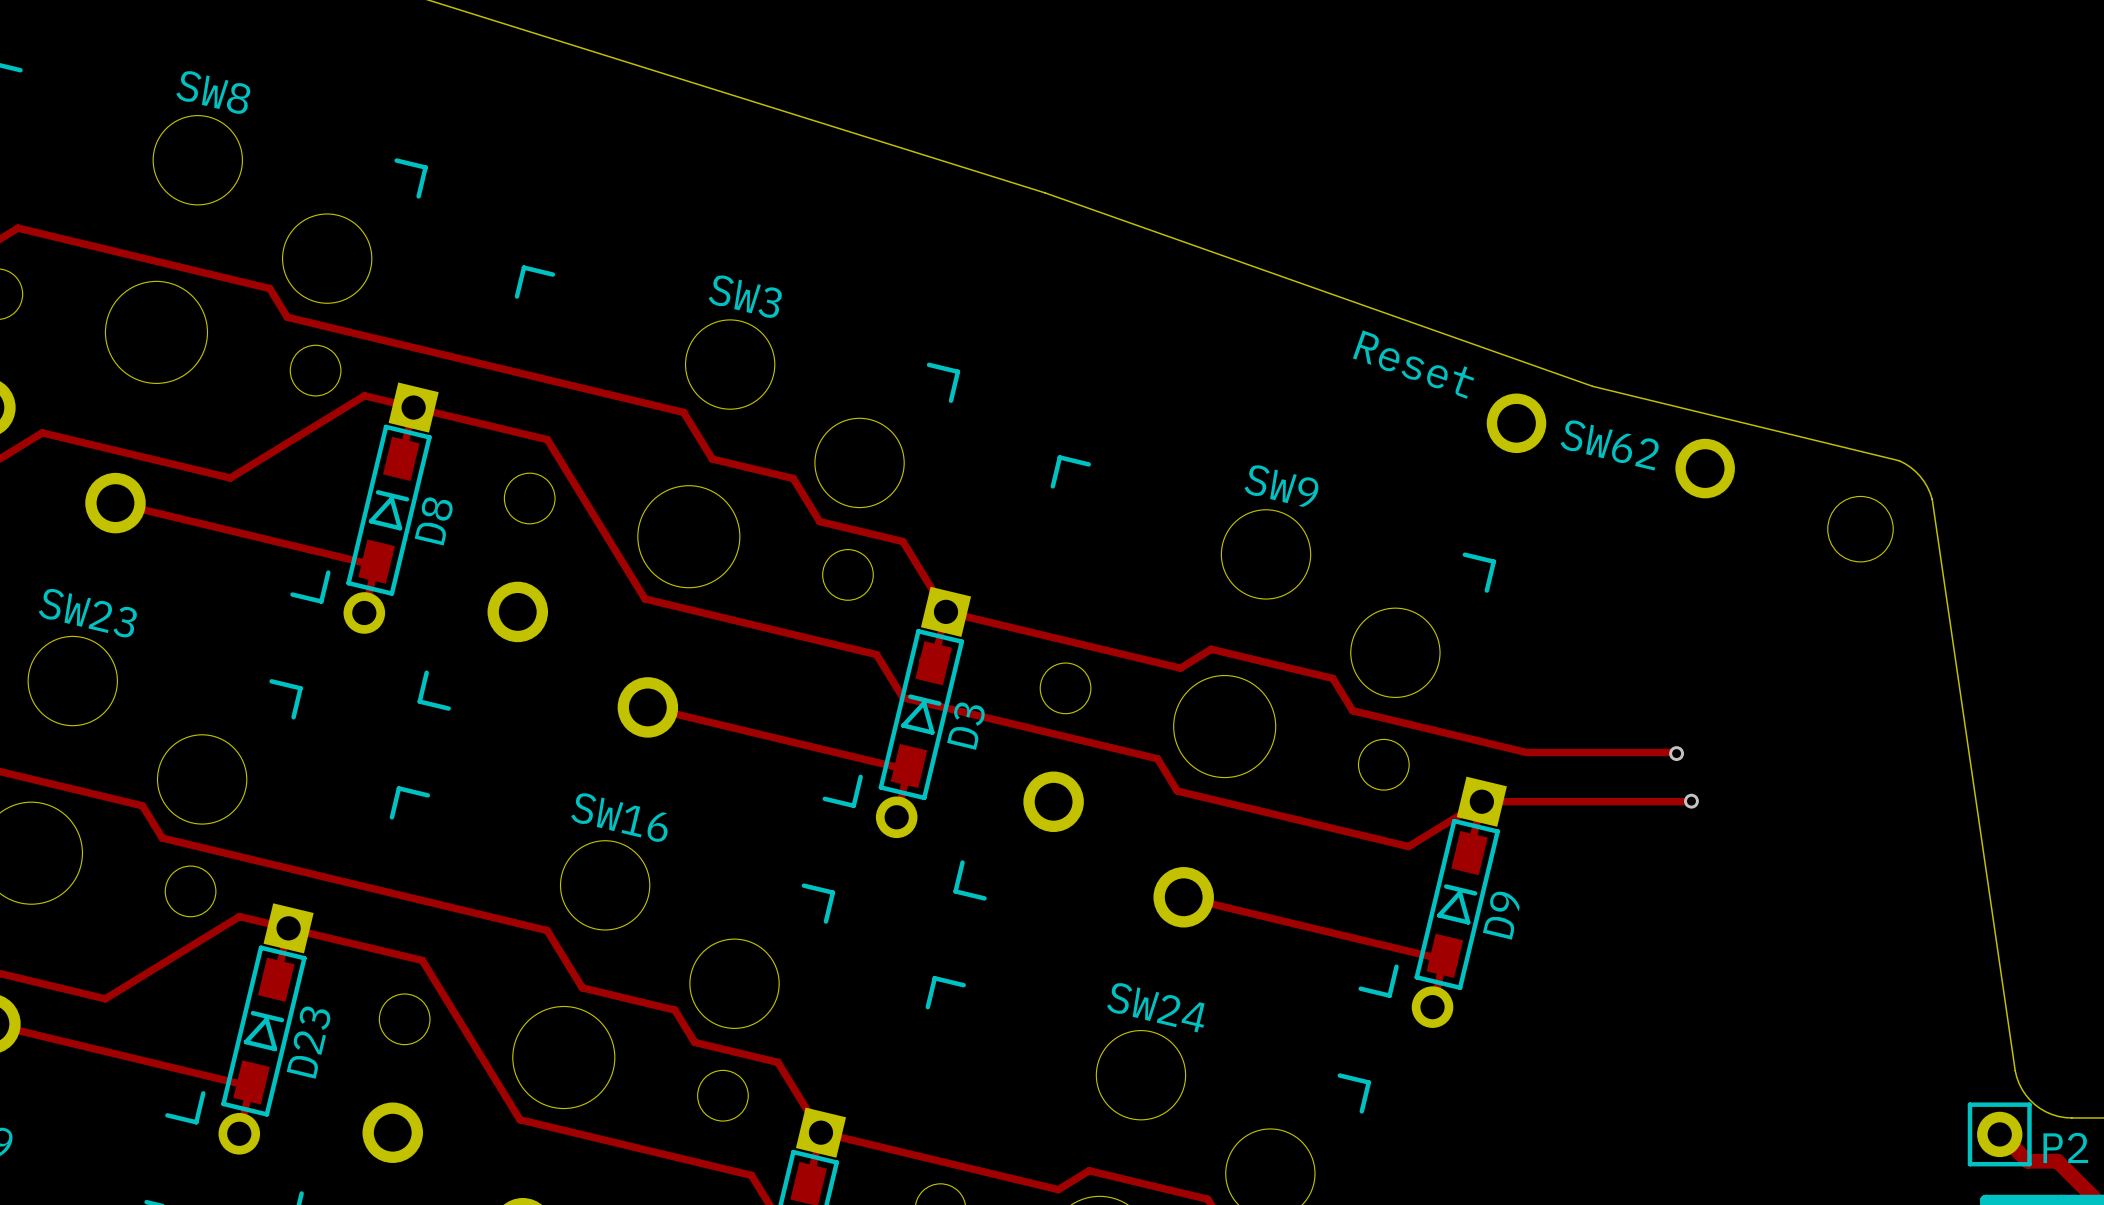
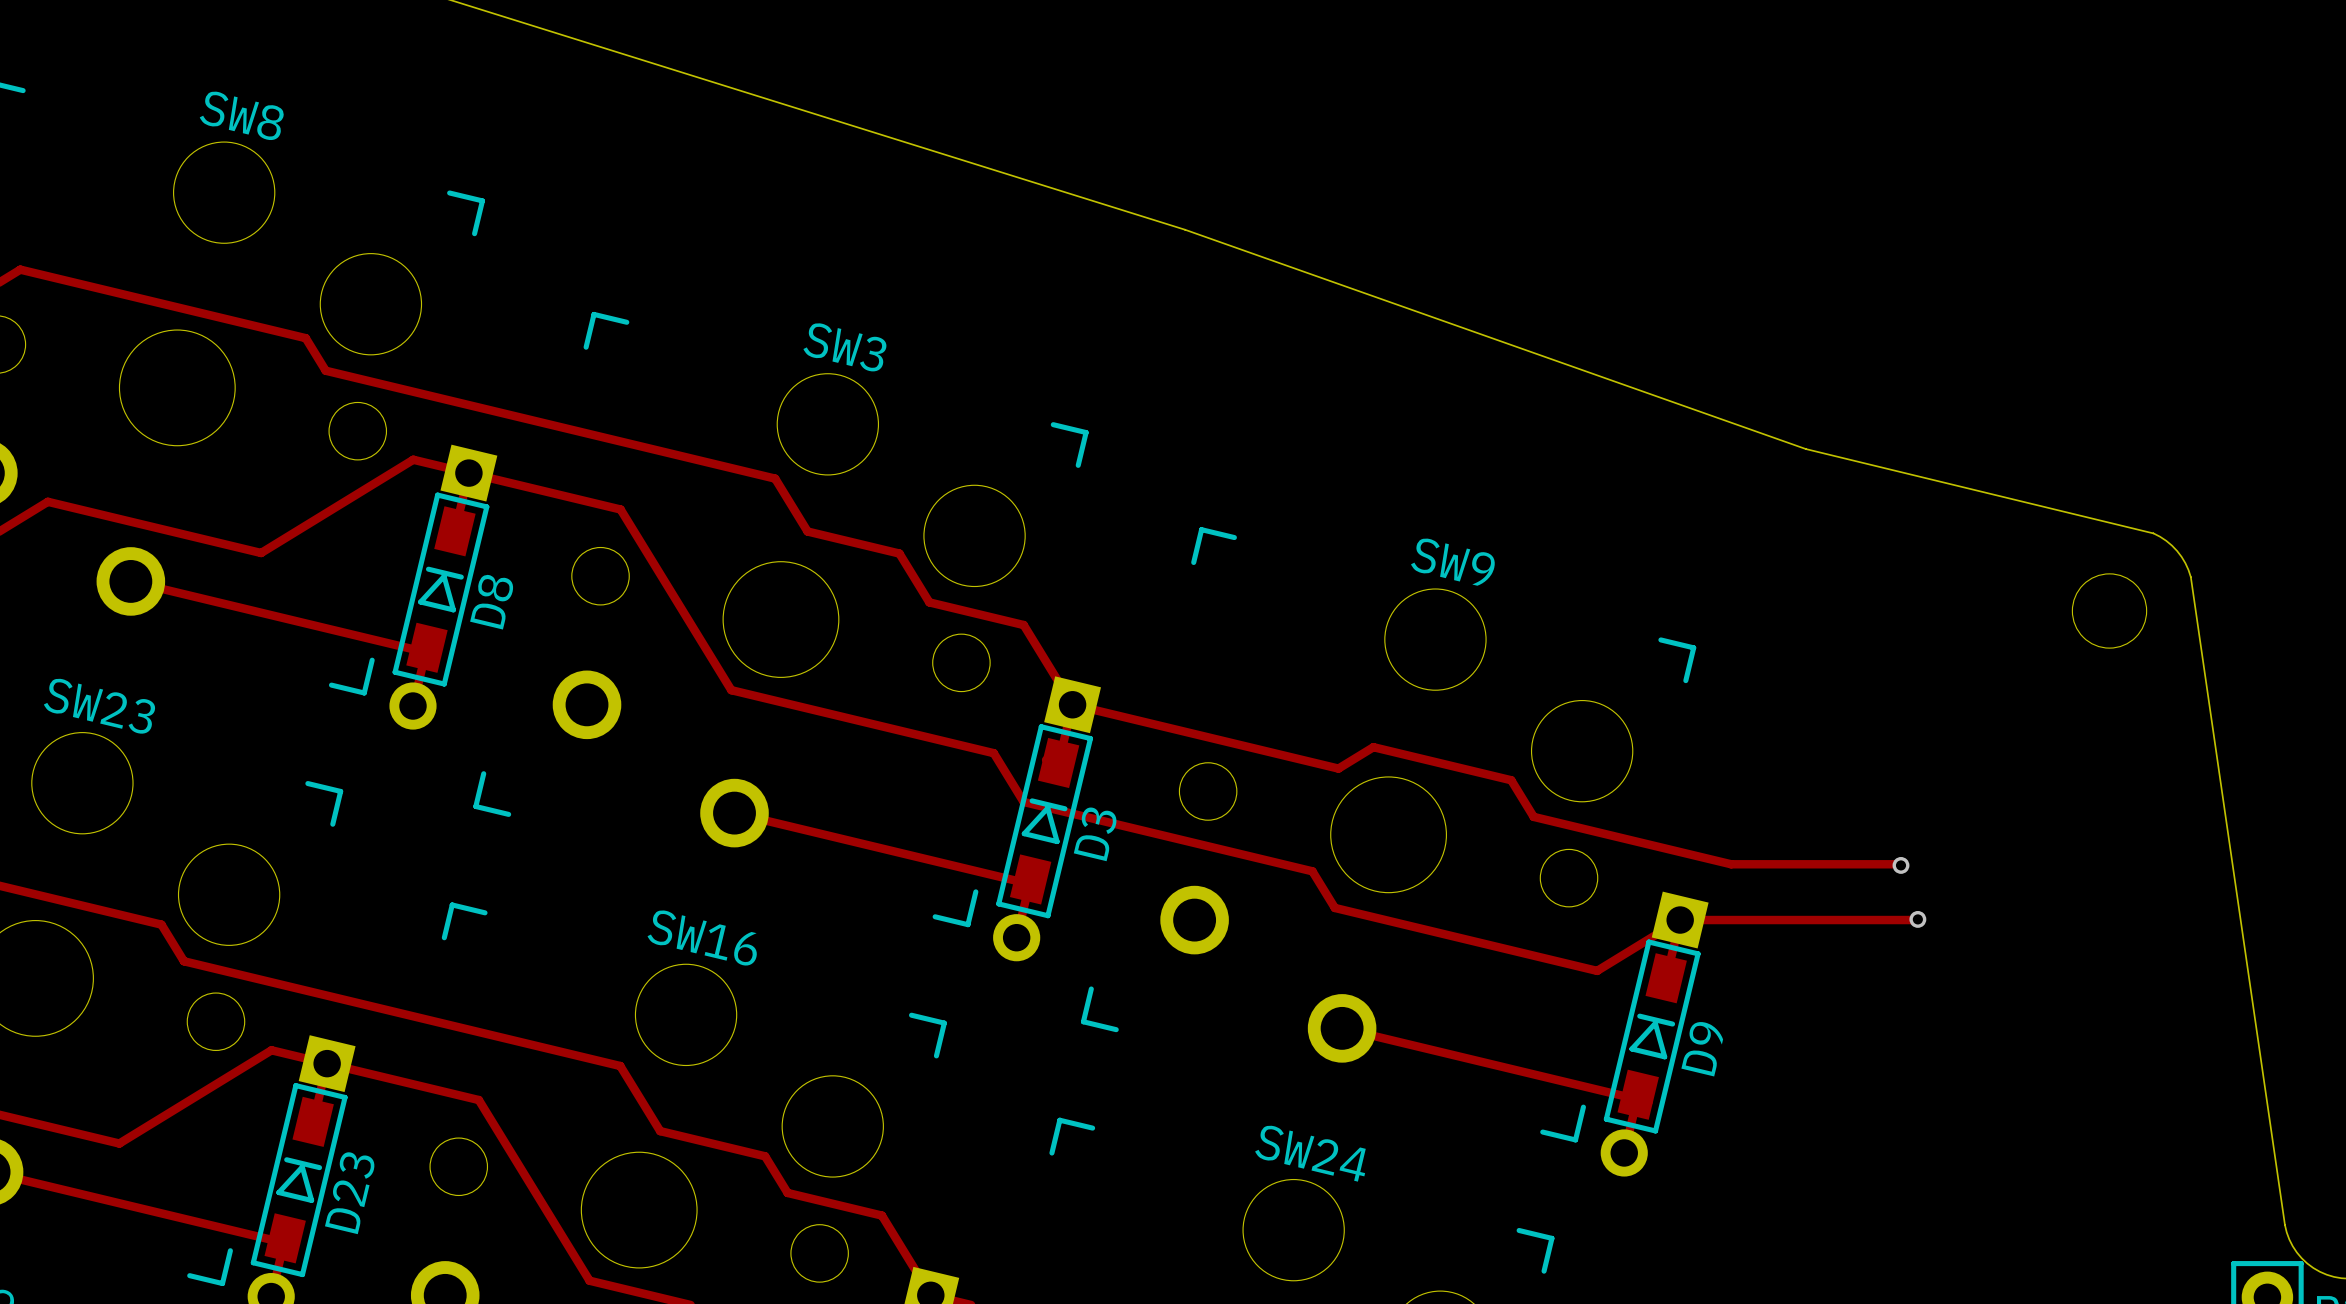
text: Reset (1413, 364) -> none
SW62: (1610, 445) -> none

